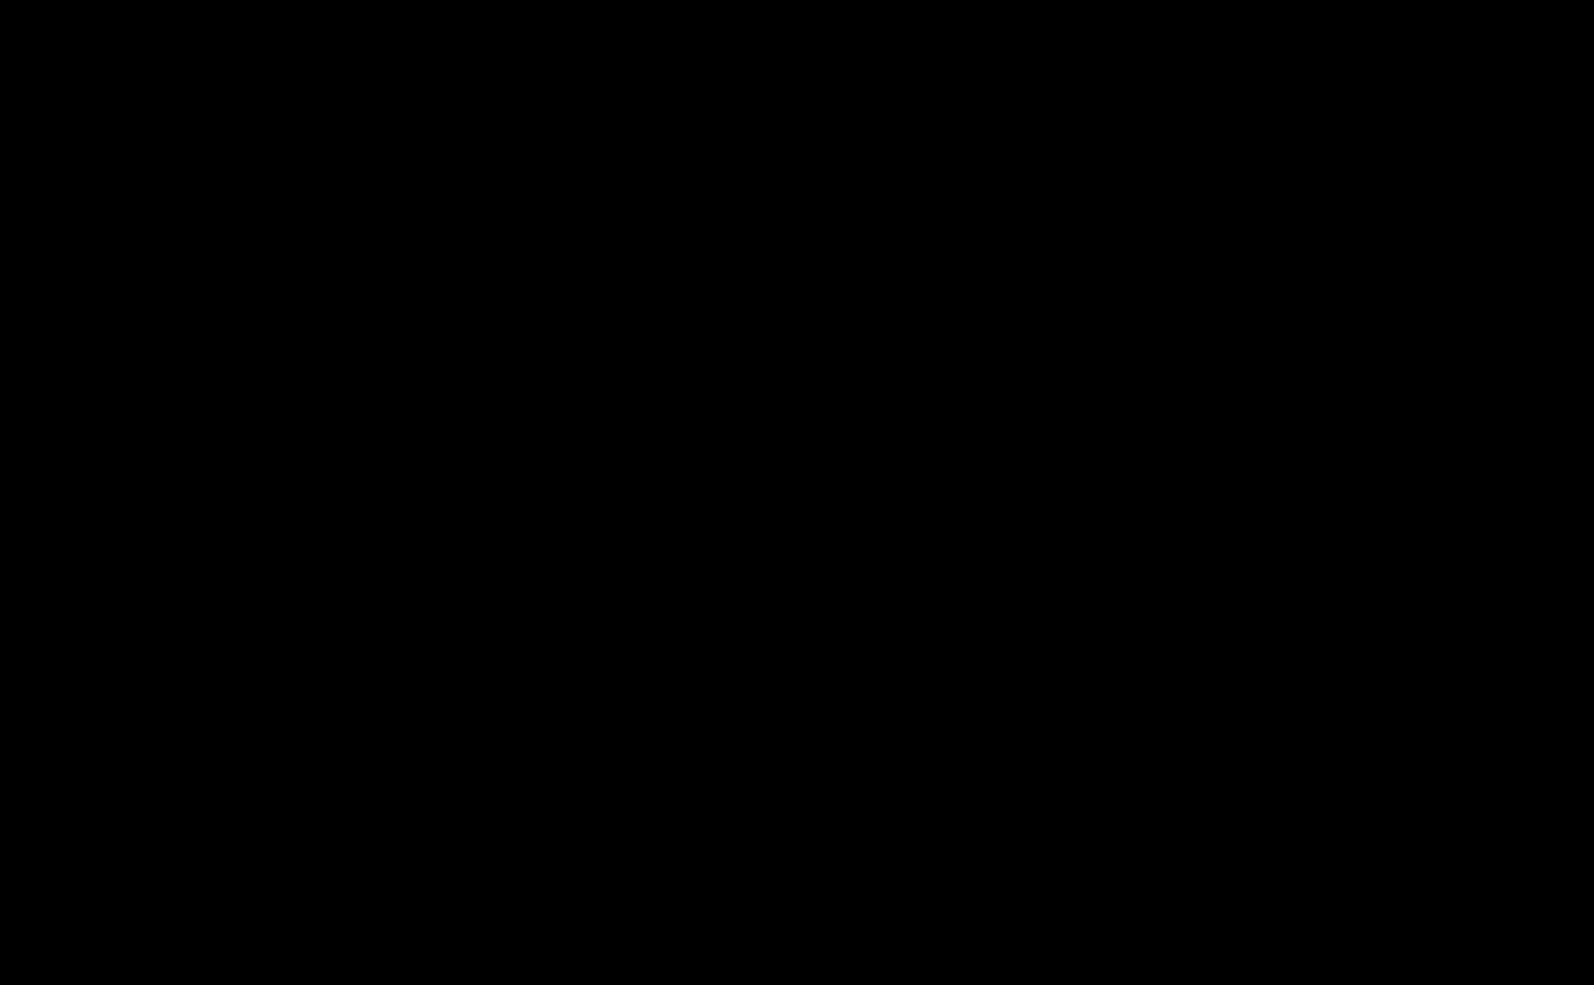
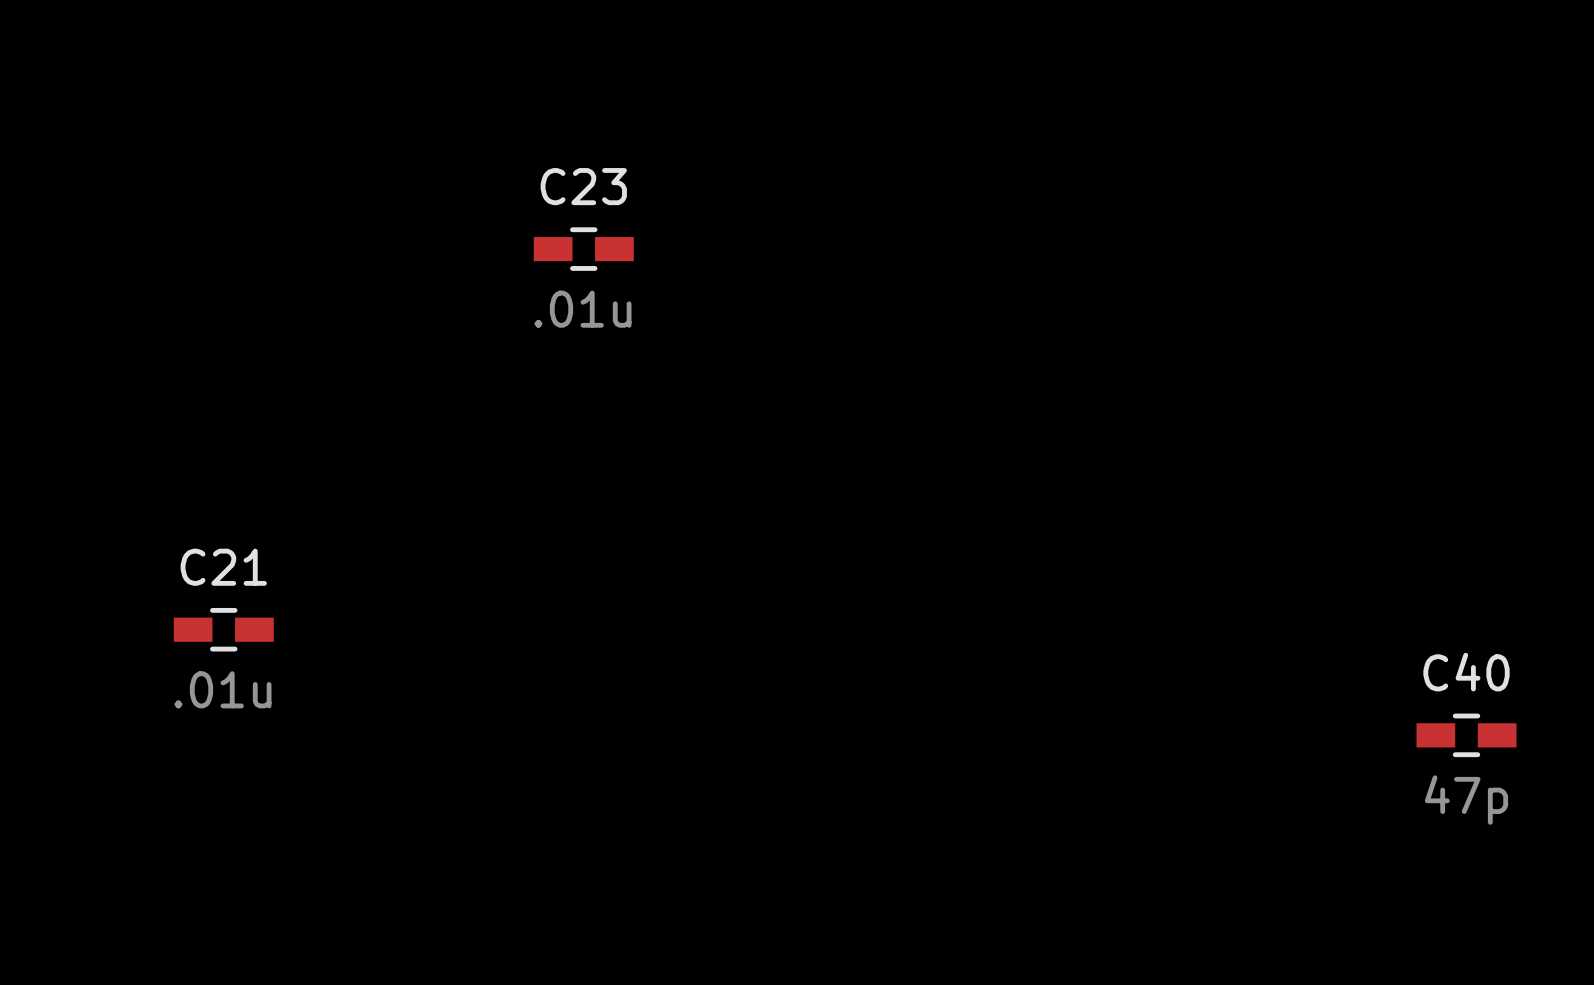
C23: none -> .01u (583, 249)
C21: none -> .01u (223, 629)
C40: none -> 47p (1466, 735)

